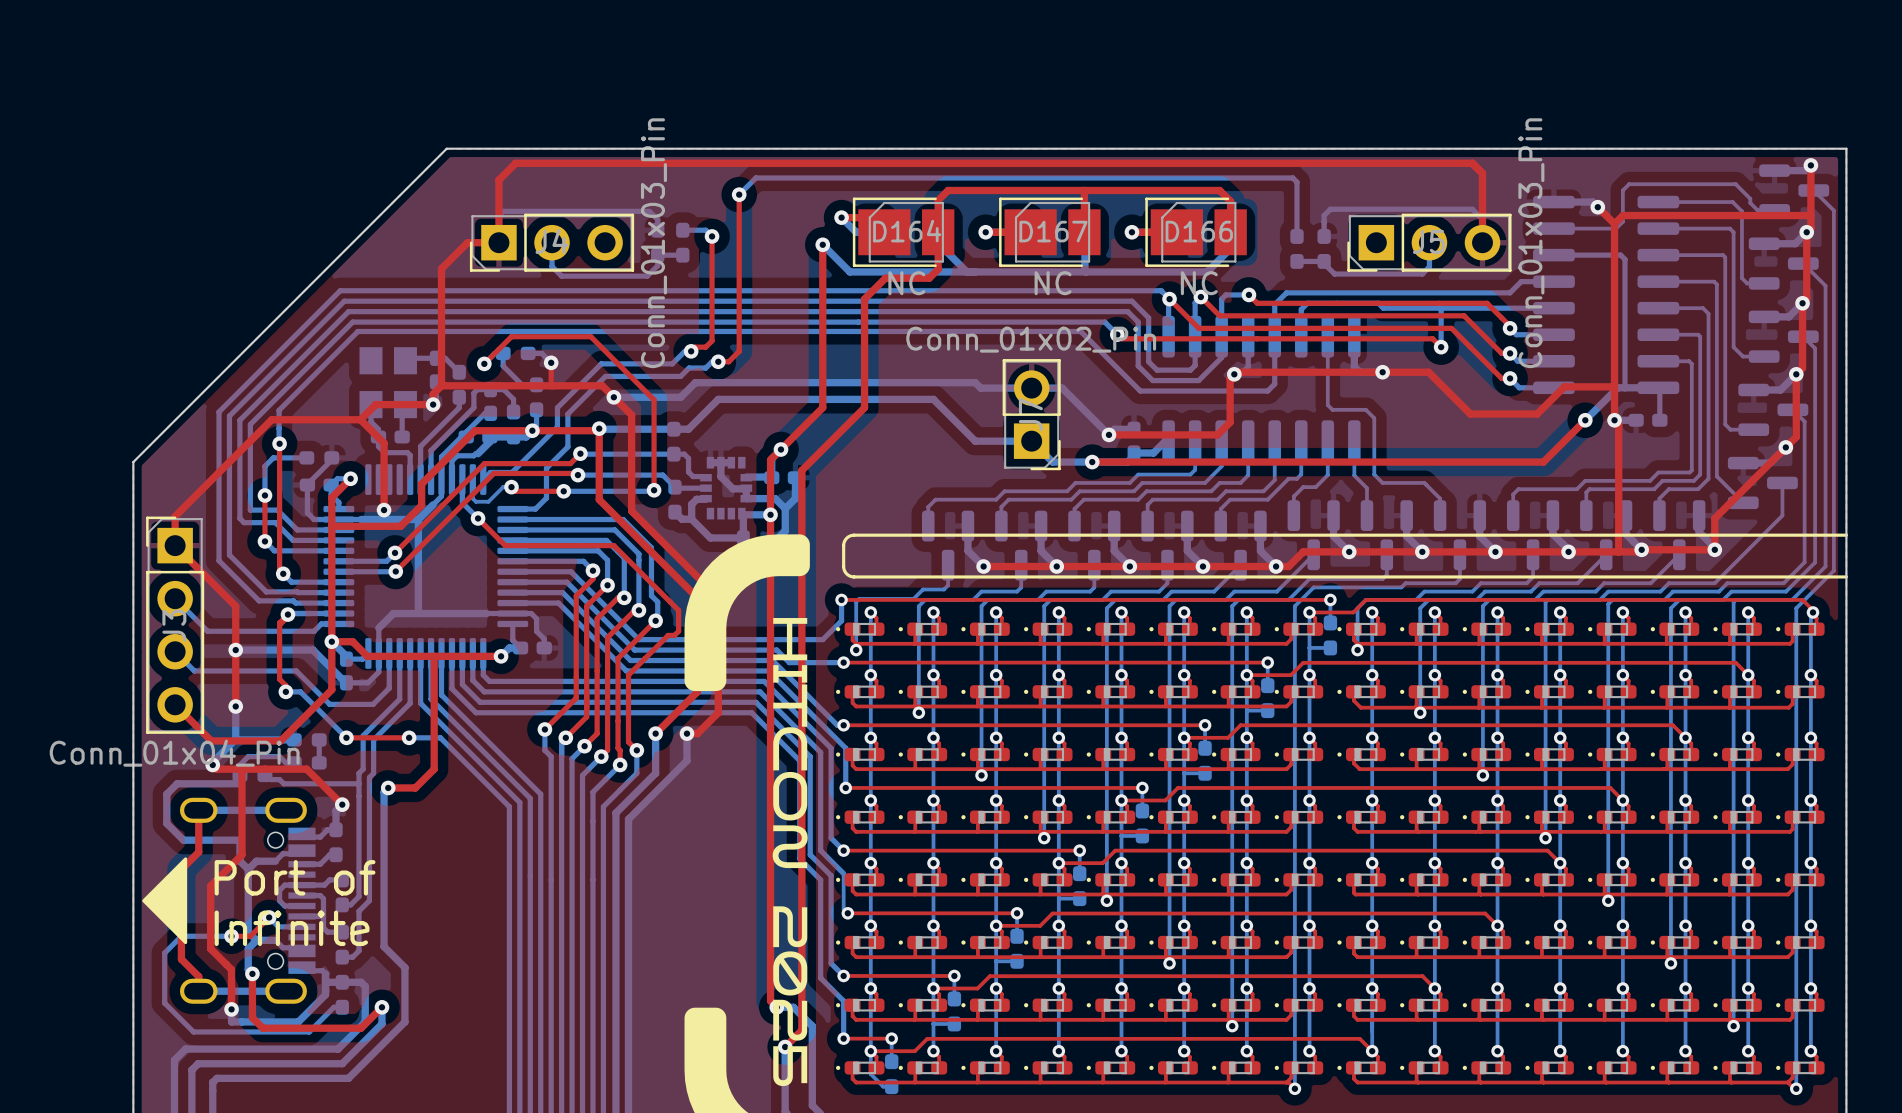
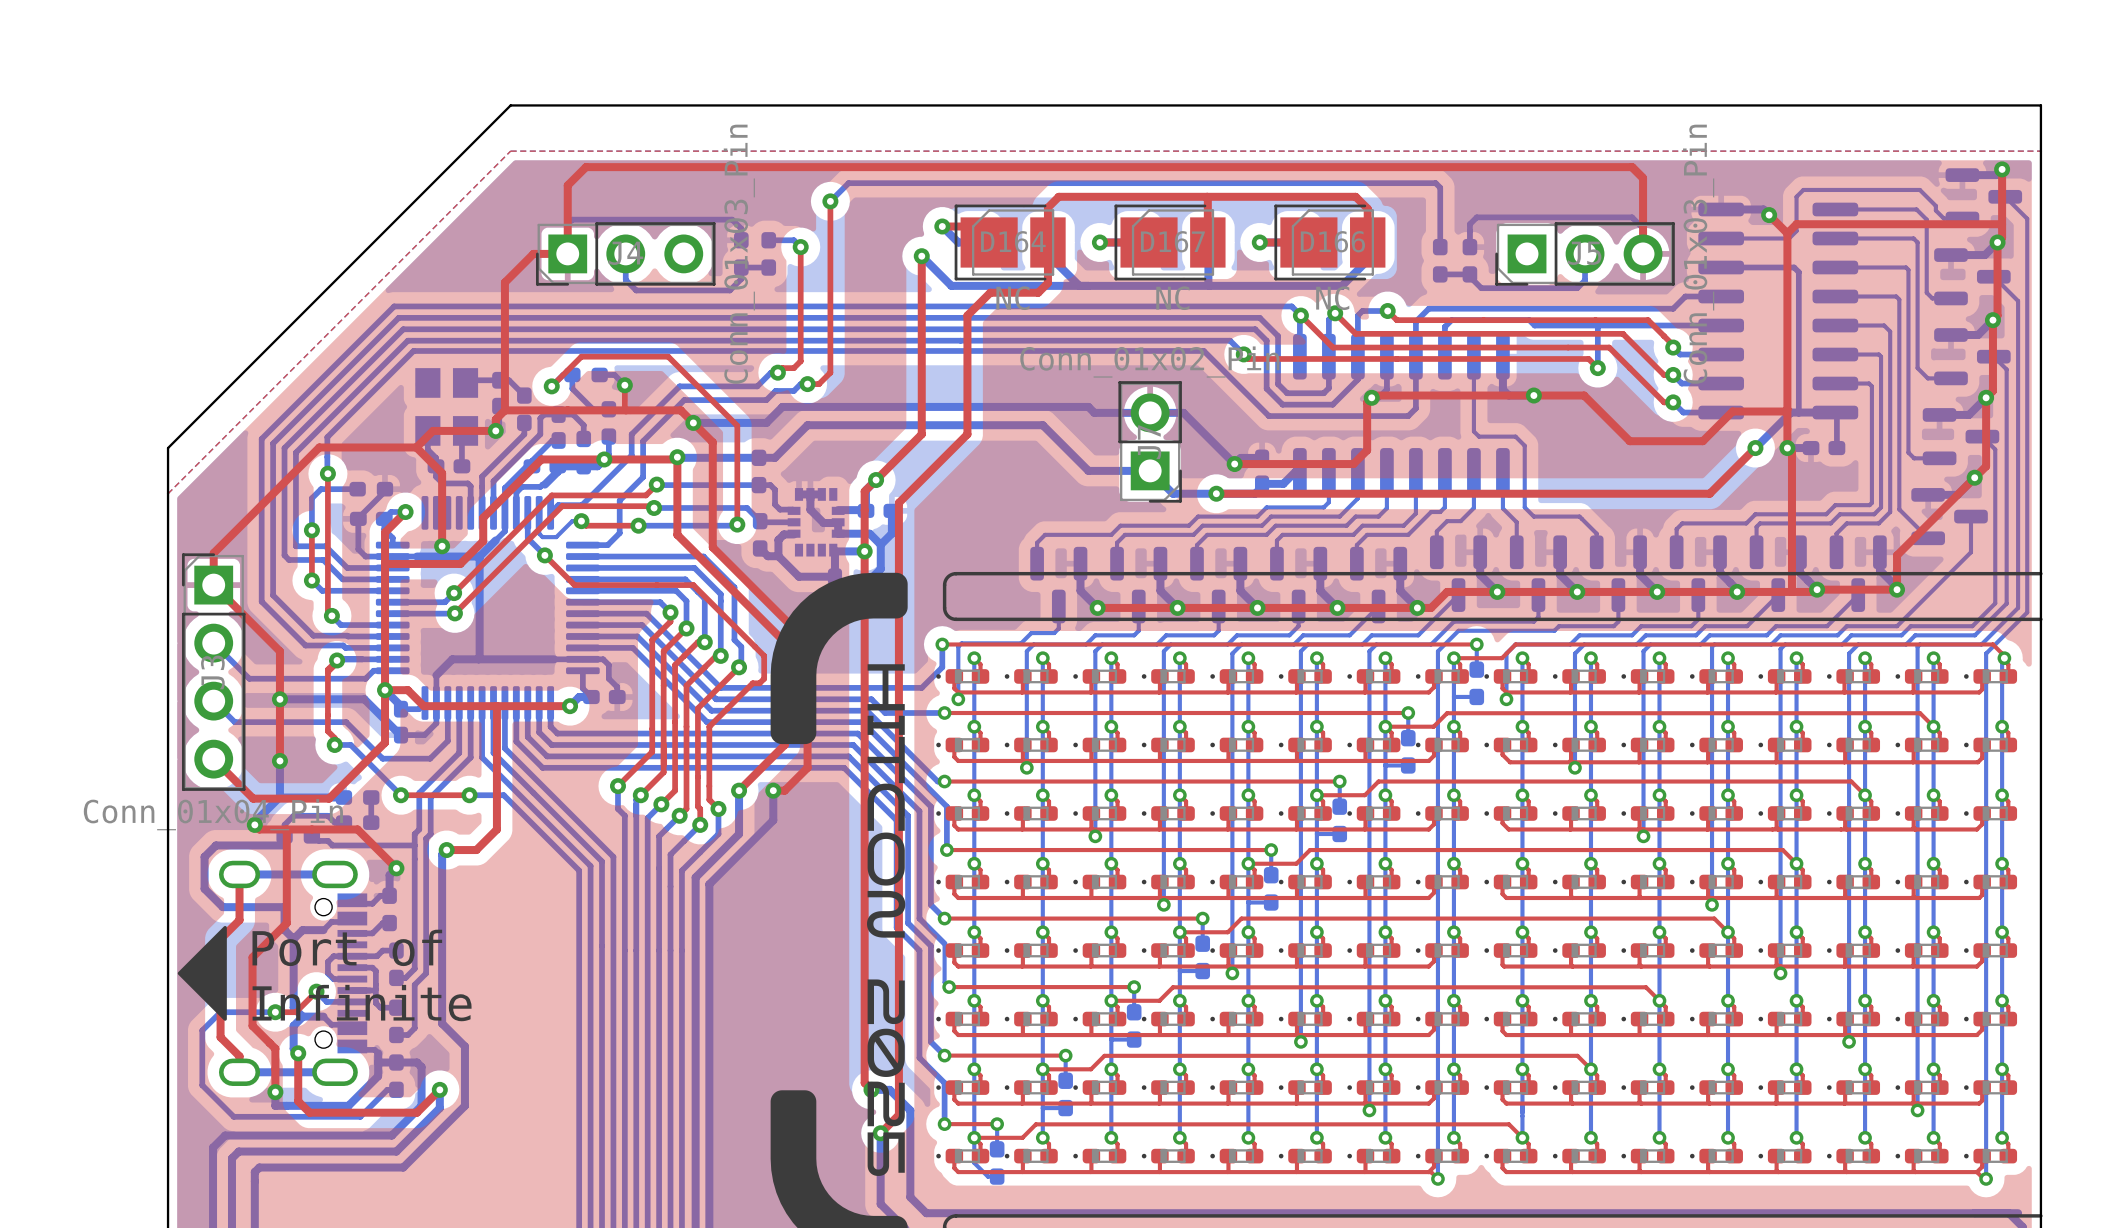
board edge: (1846, 148) (446, 148) (133, 462) -> (2040, 151) (2040, 105) (510, 105) (168, 448) (168, 493)

